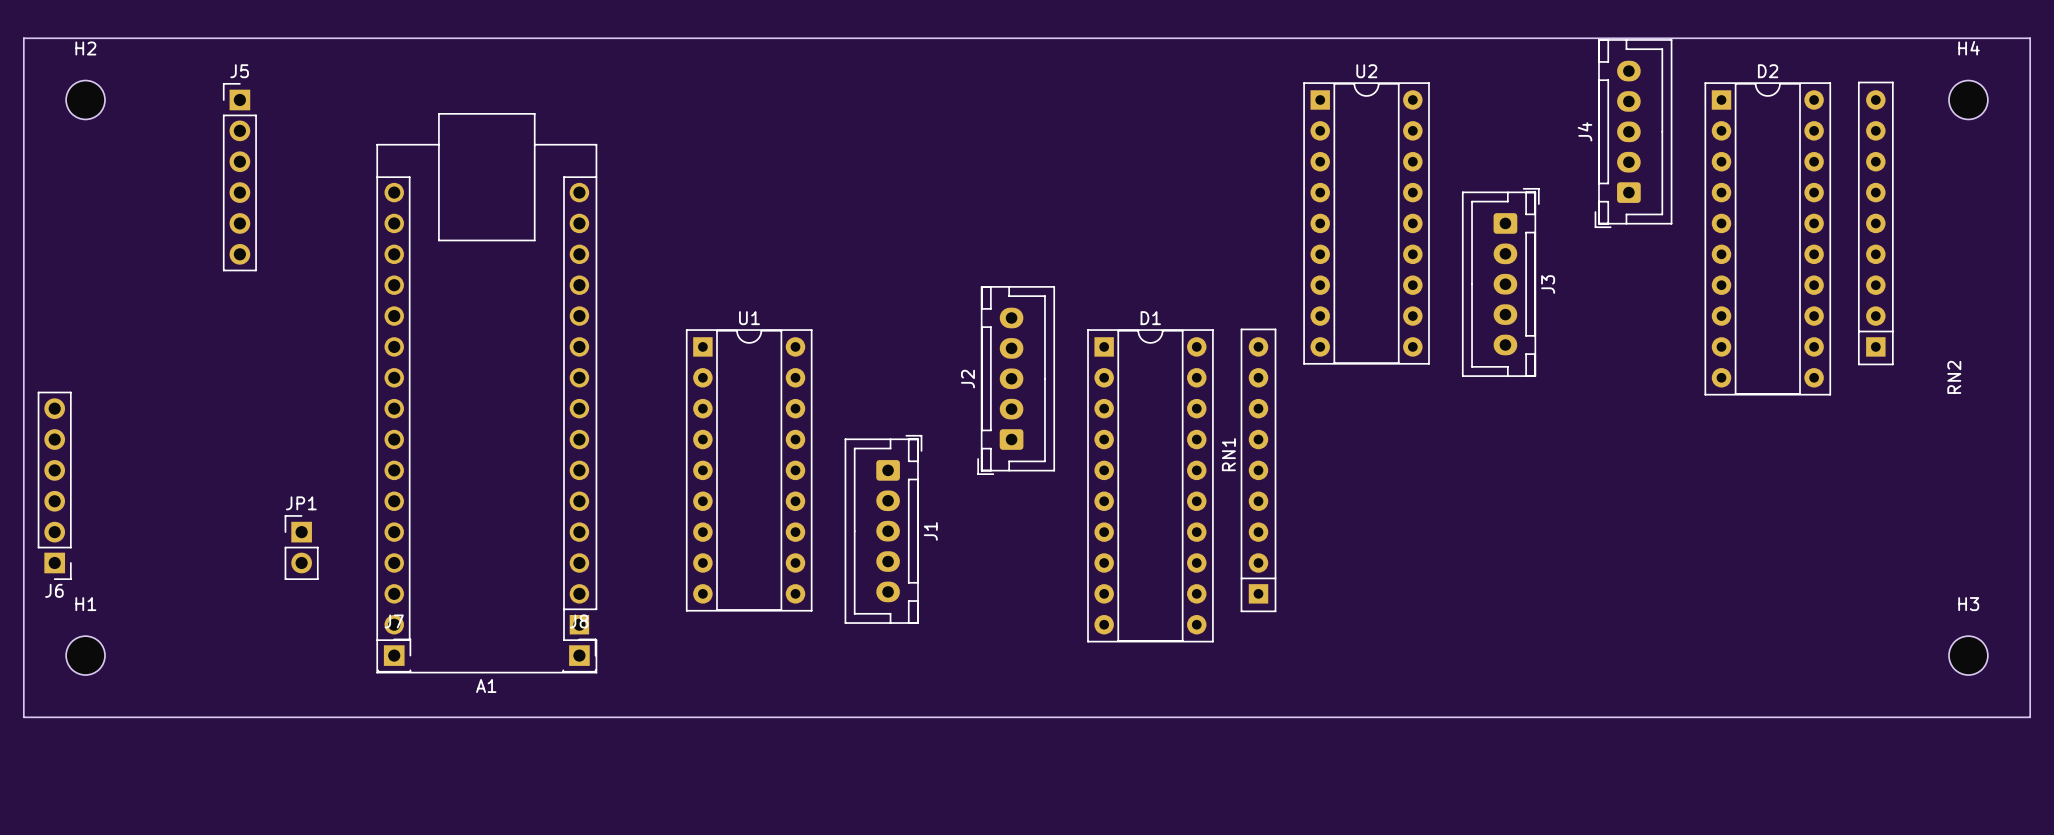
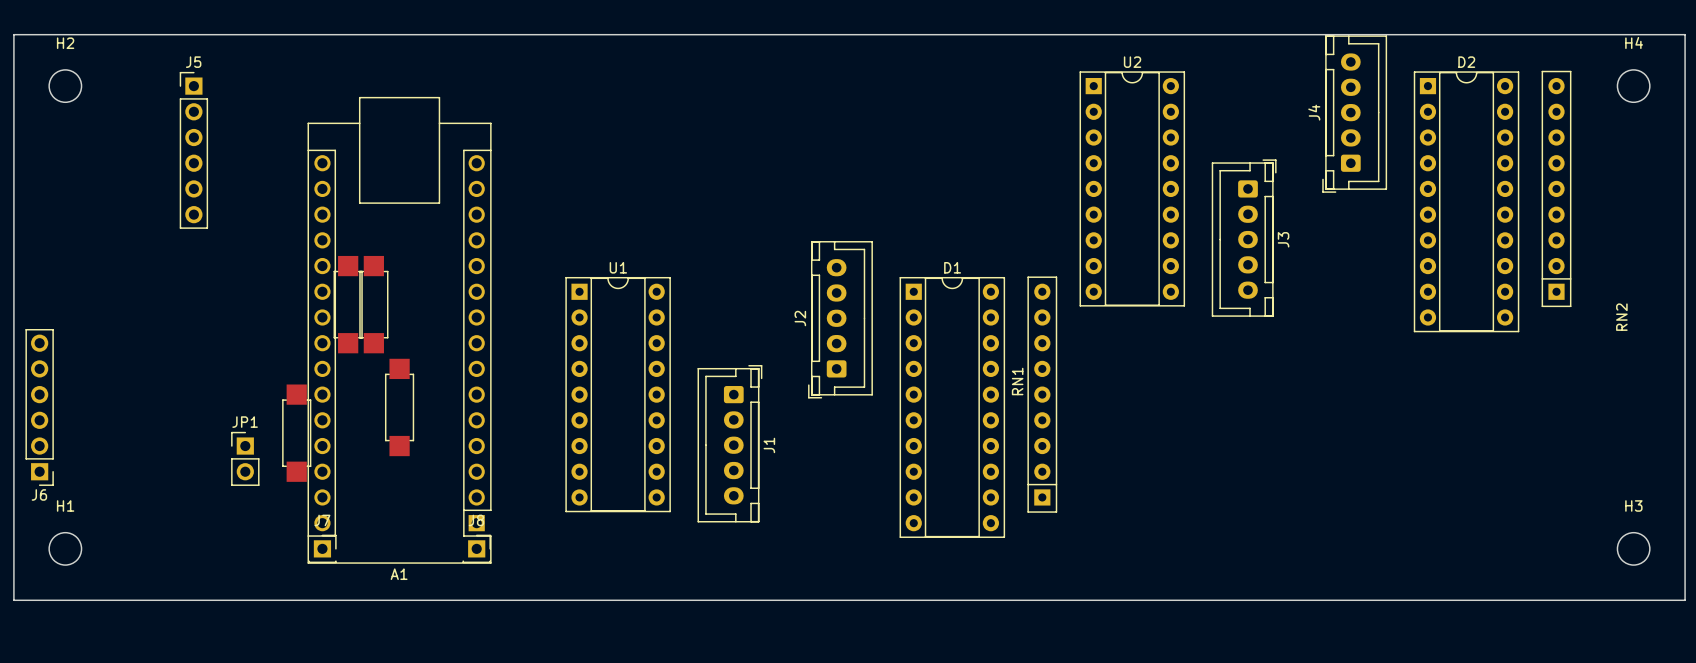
part: none -> (348, 304)
part: none -> (373, 304)
part: none -> (399, 407)
part: none -> (296, 433)

